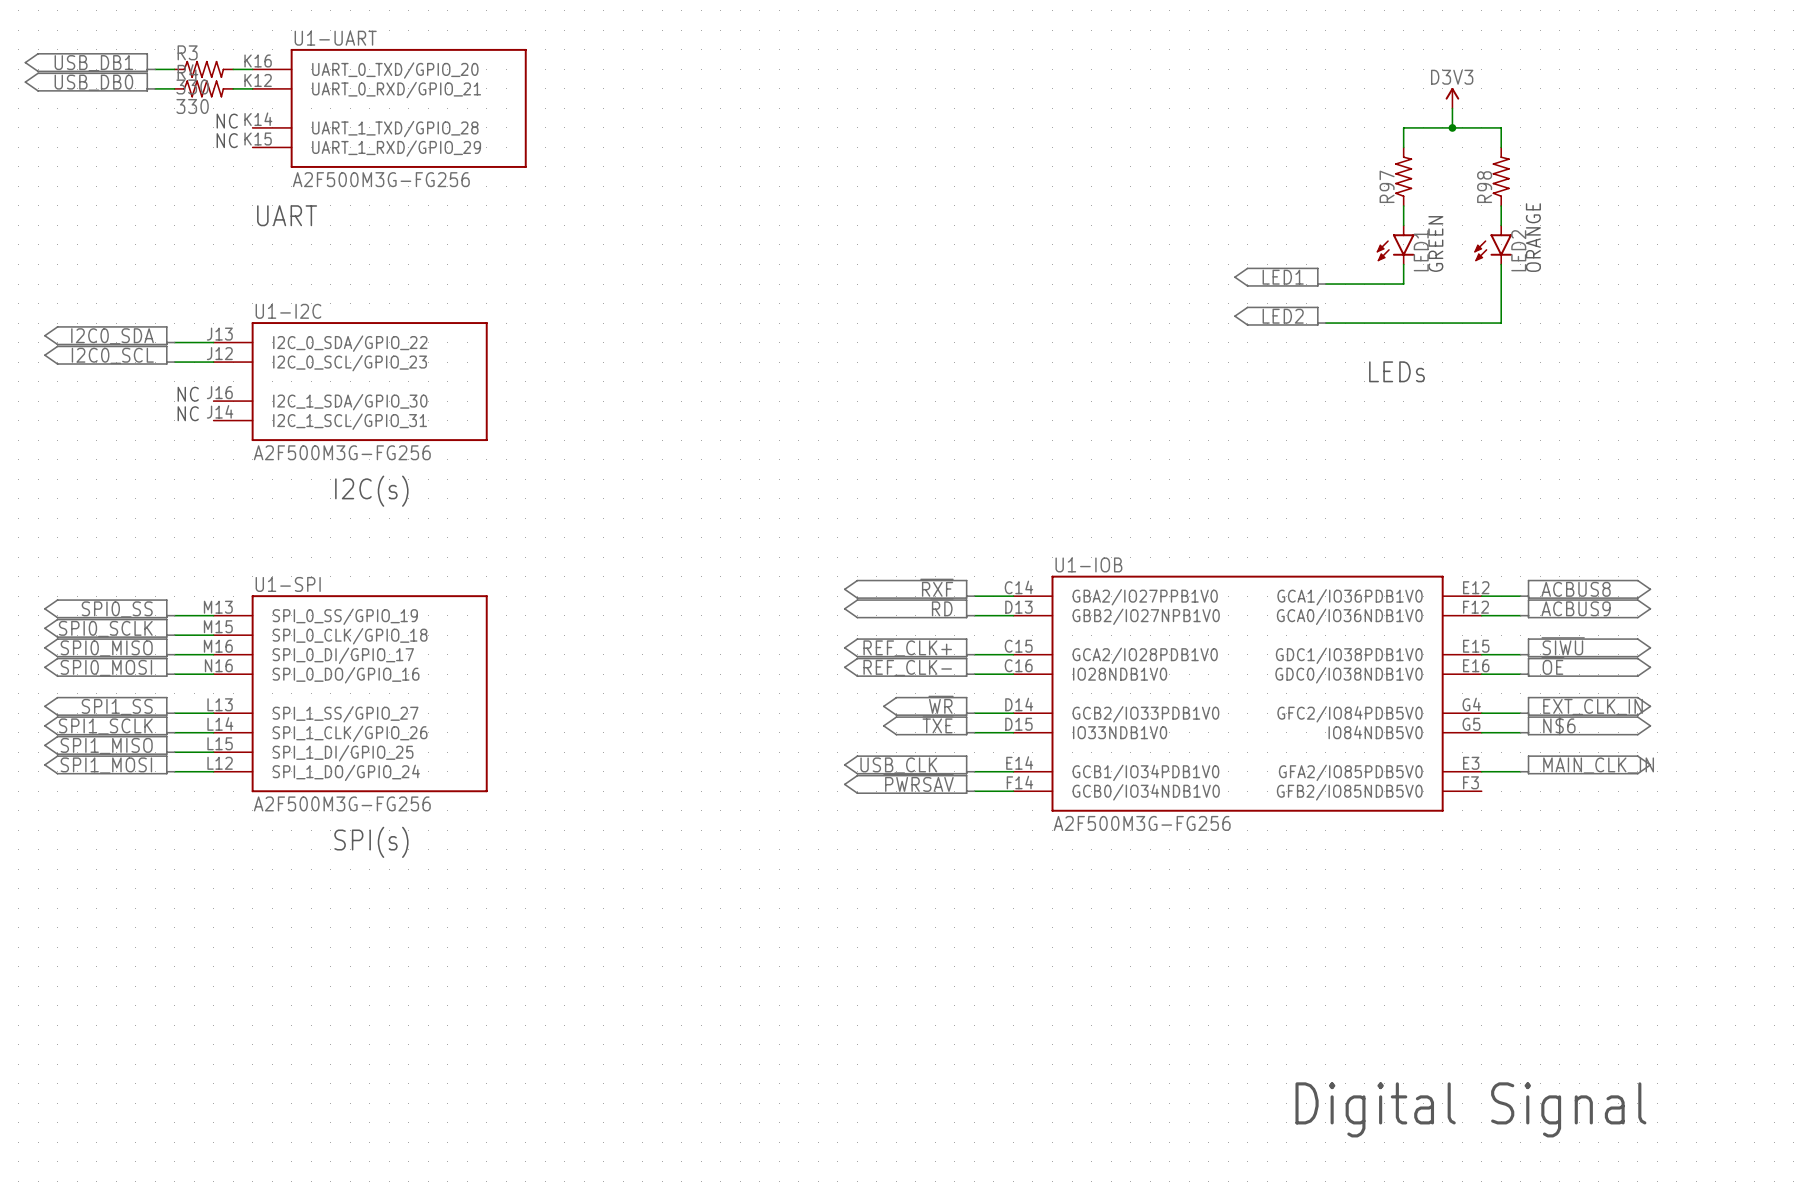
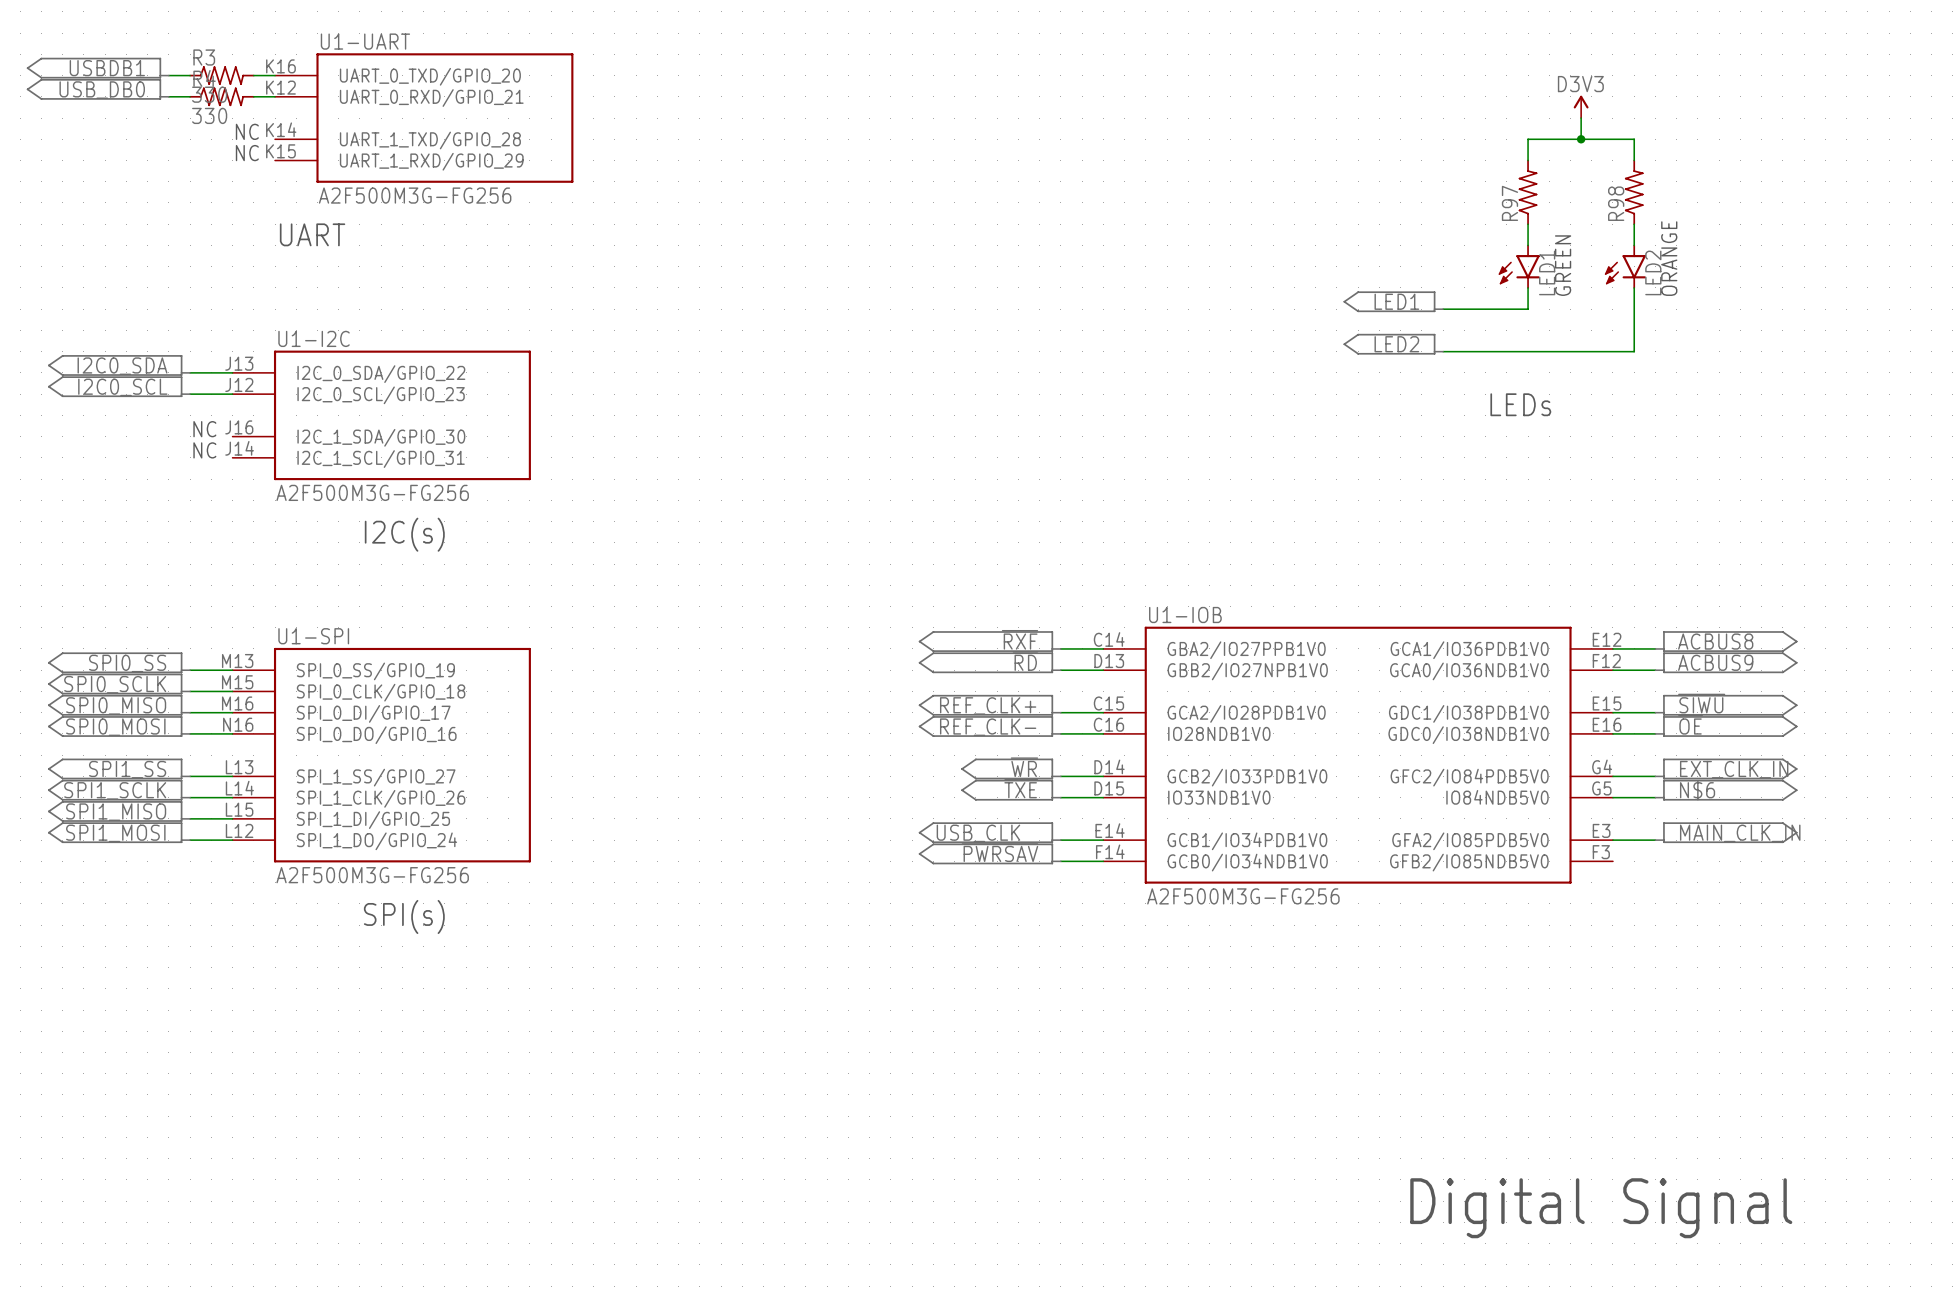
label: USB_DB1 (93, 63) -> USBDB1 (107, 68)

